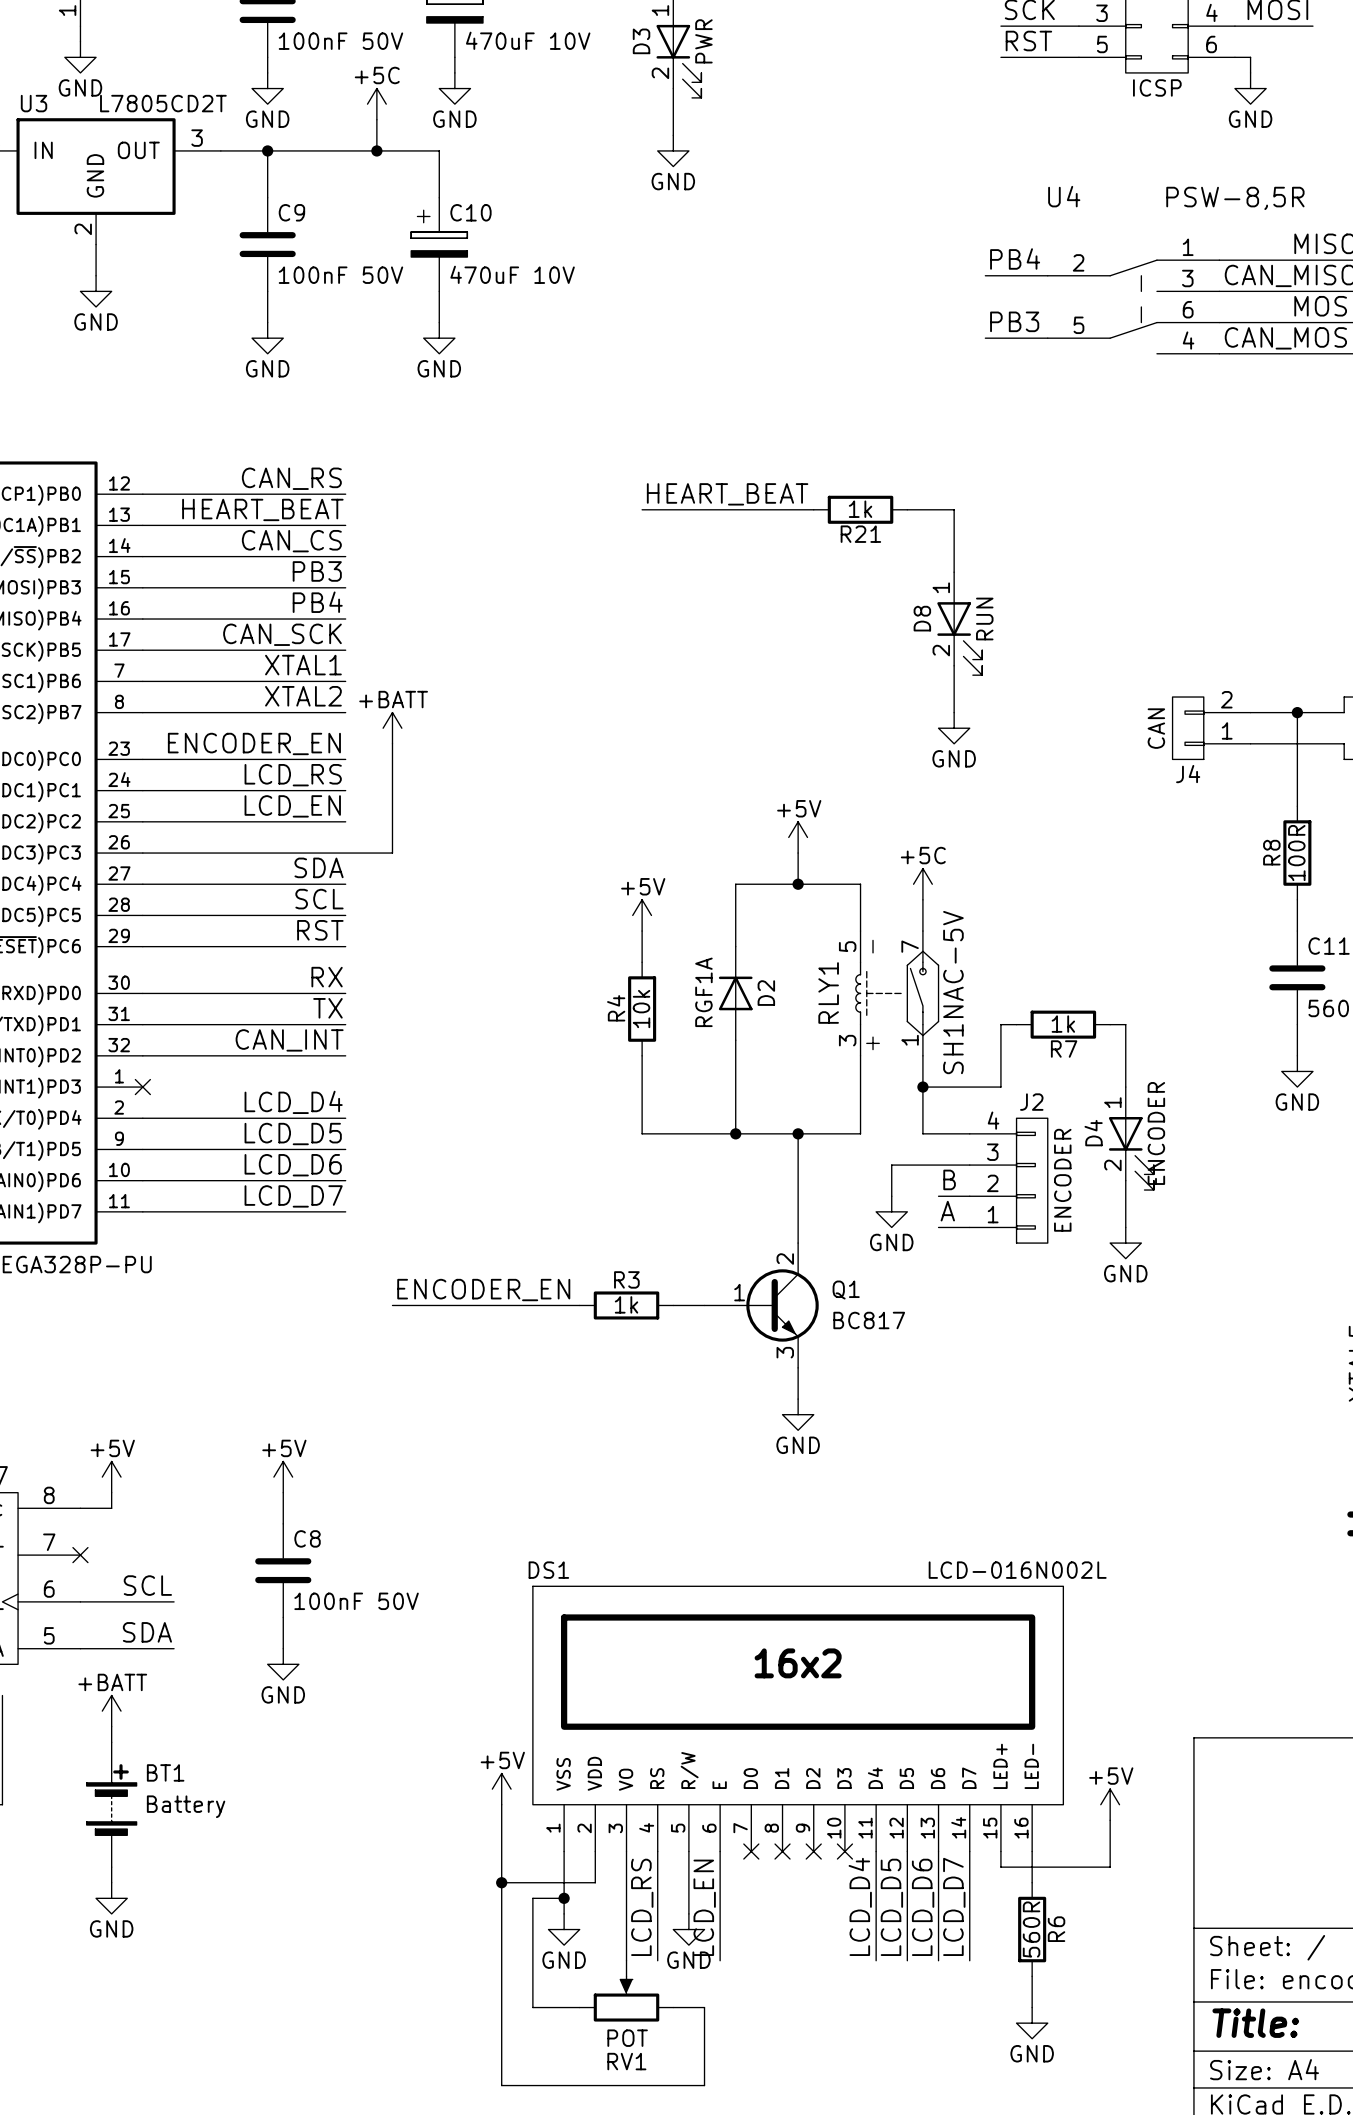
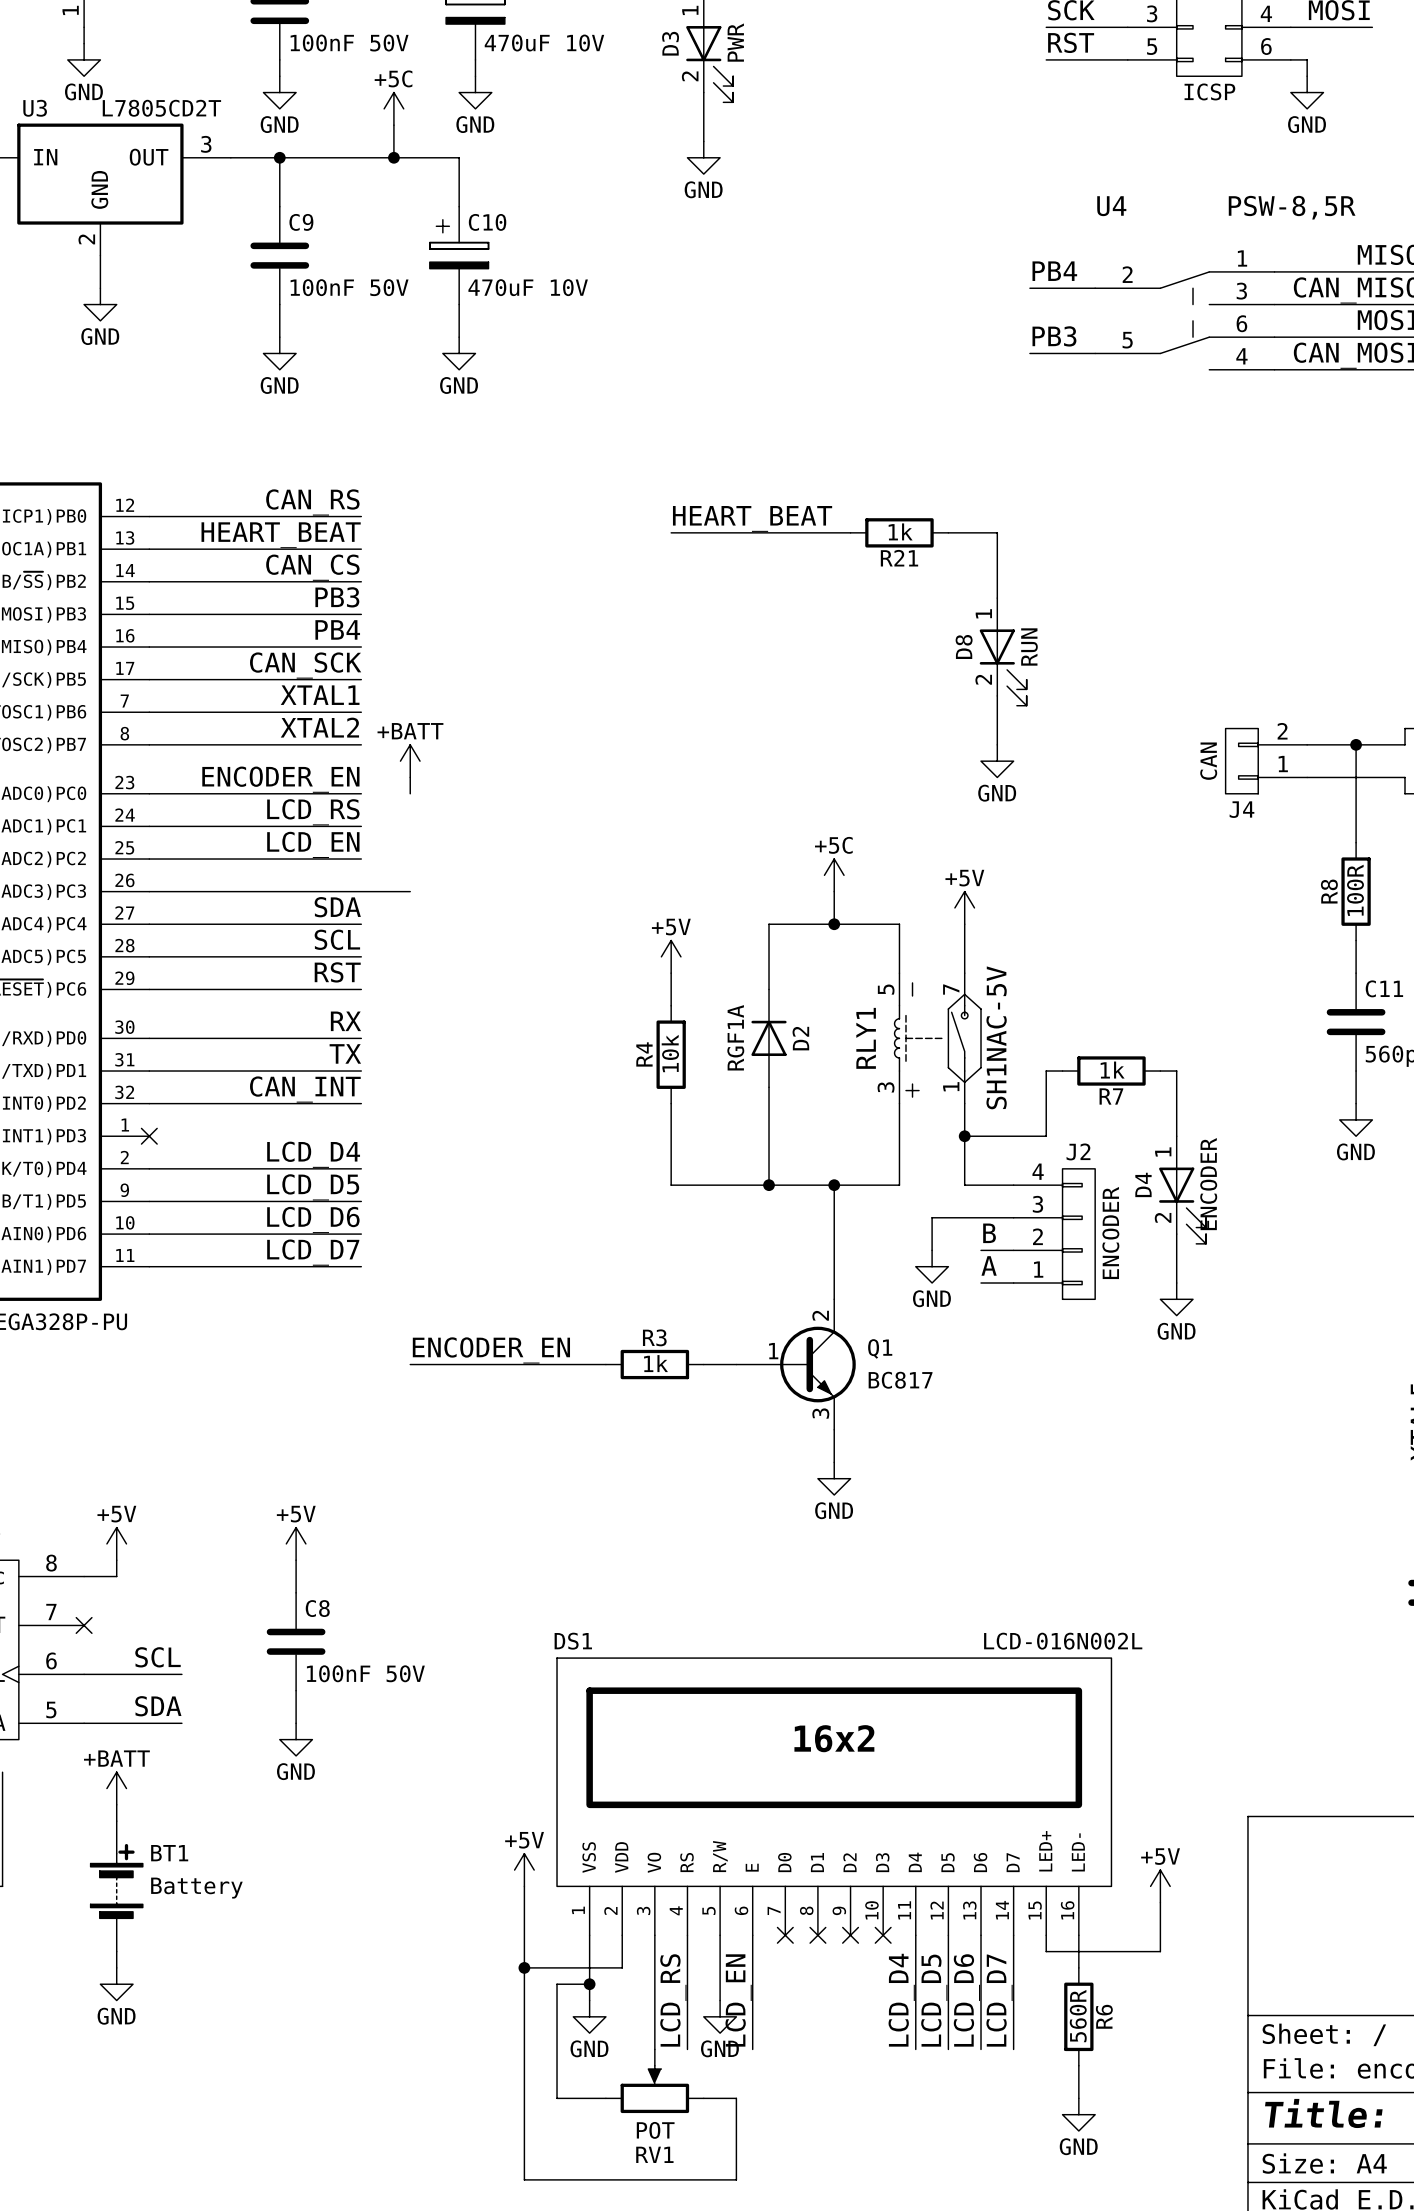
wire: (392, 759) (392, 853) -> none
power symbol: +5V (798, 837) -> +5C (834, 875)
power symbol: none -> +5V (964, 907)
power symbol: +5C (922, 884) -> none

